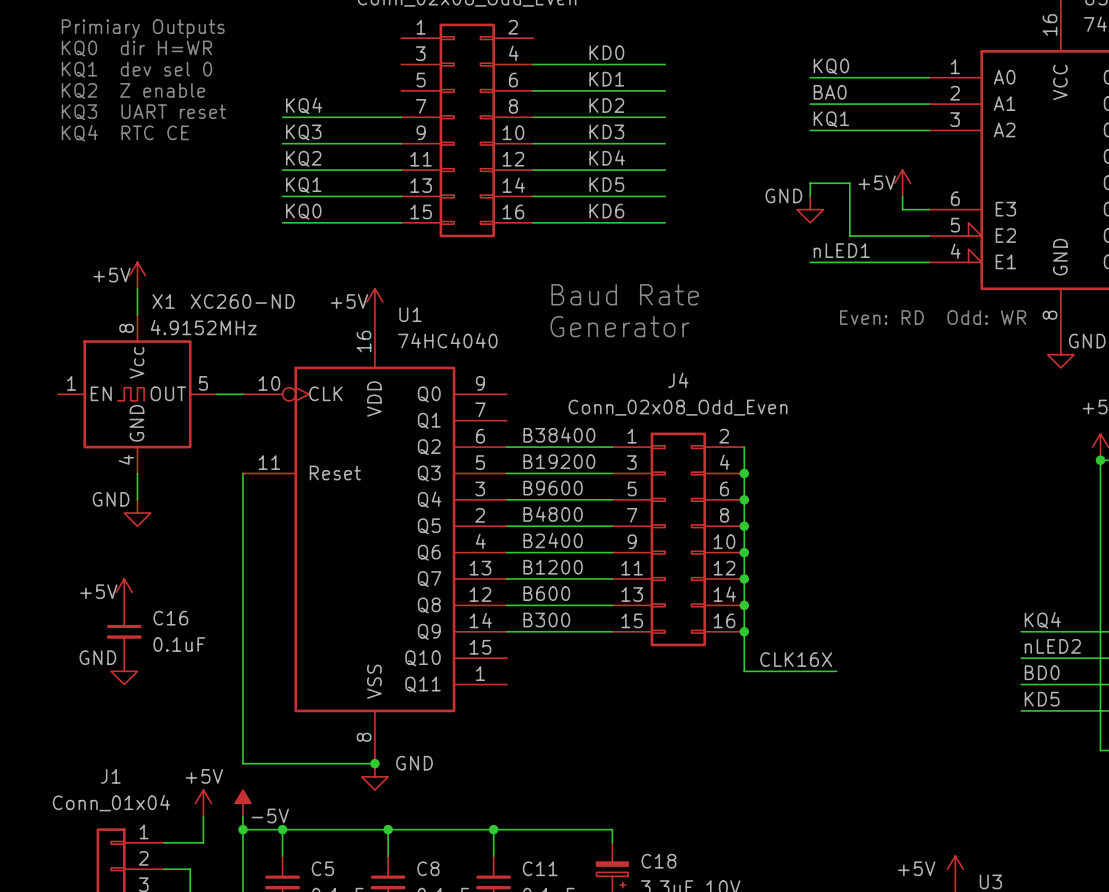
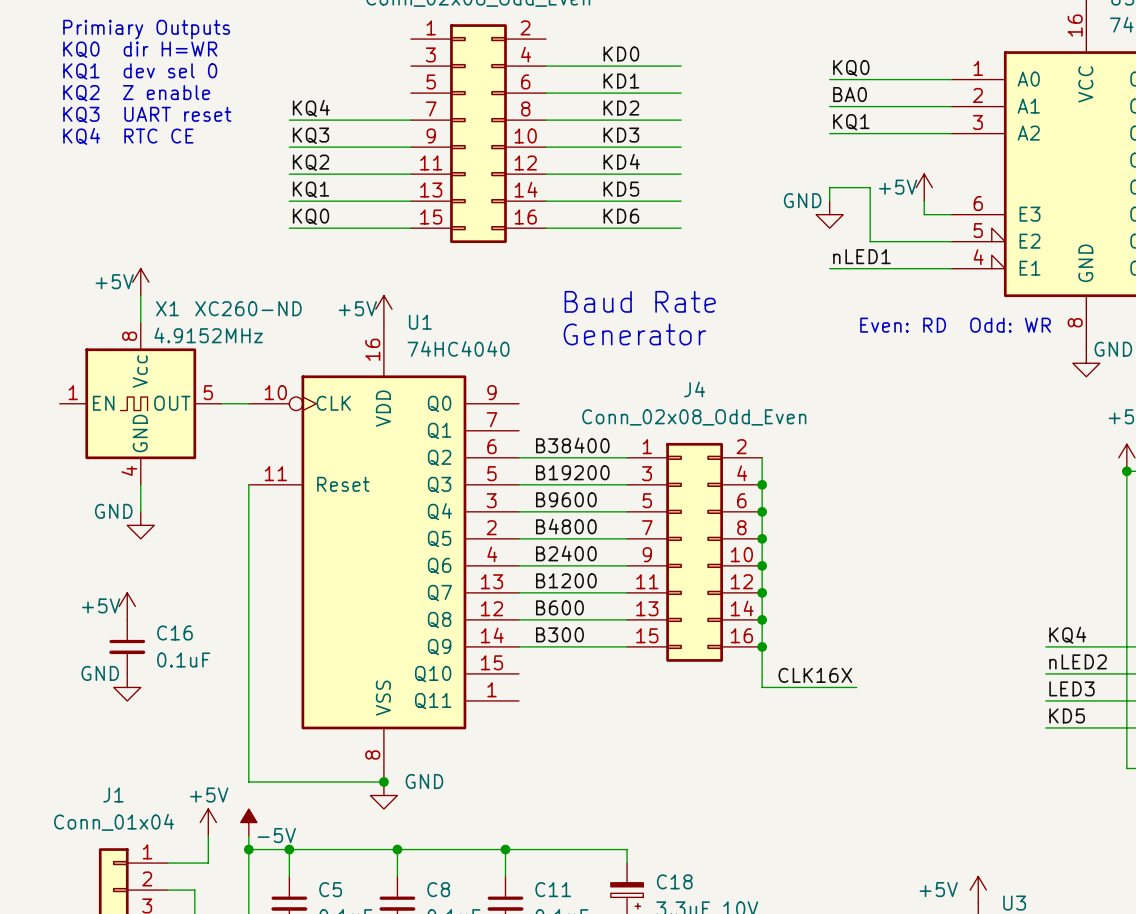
label: BD0 (1042, 672) -> LED3 (1071, 688)

